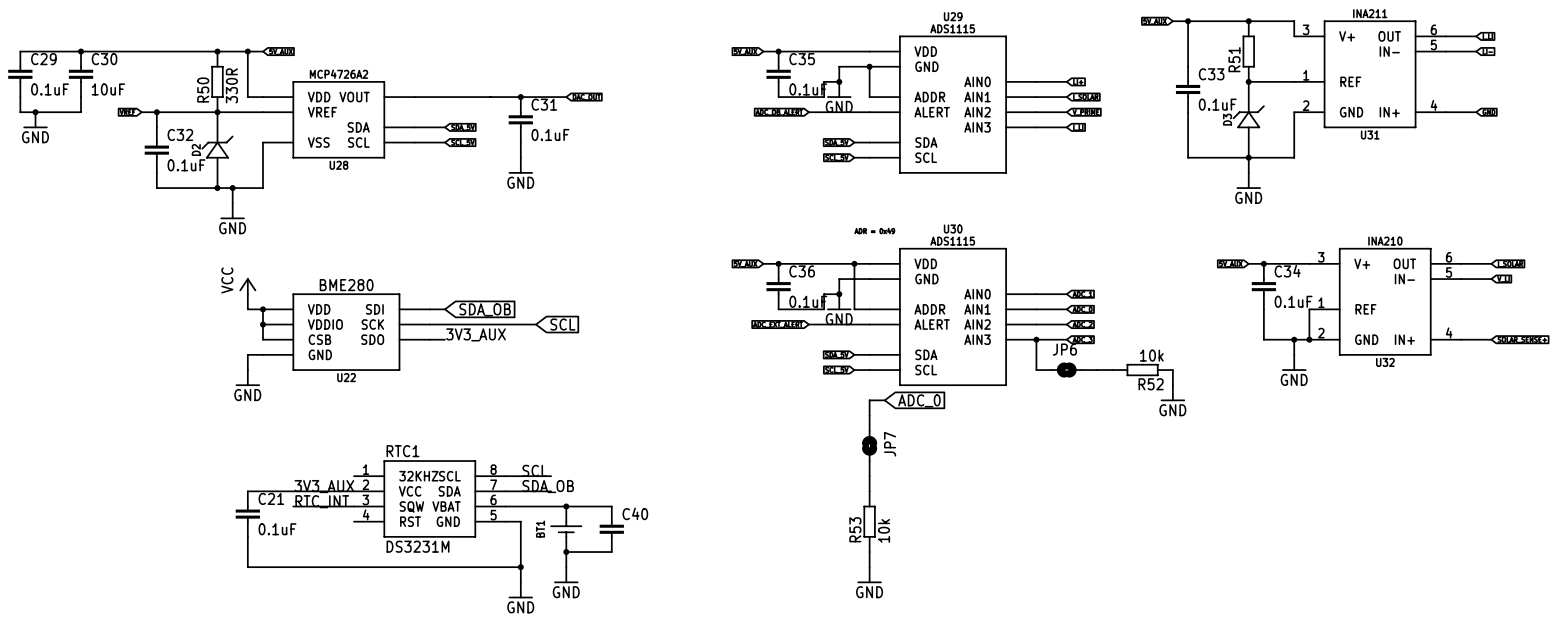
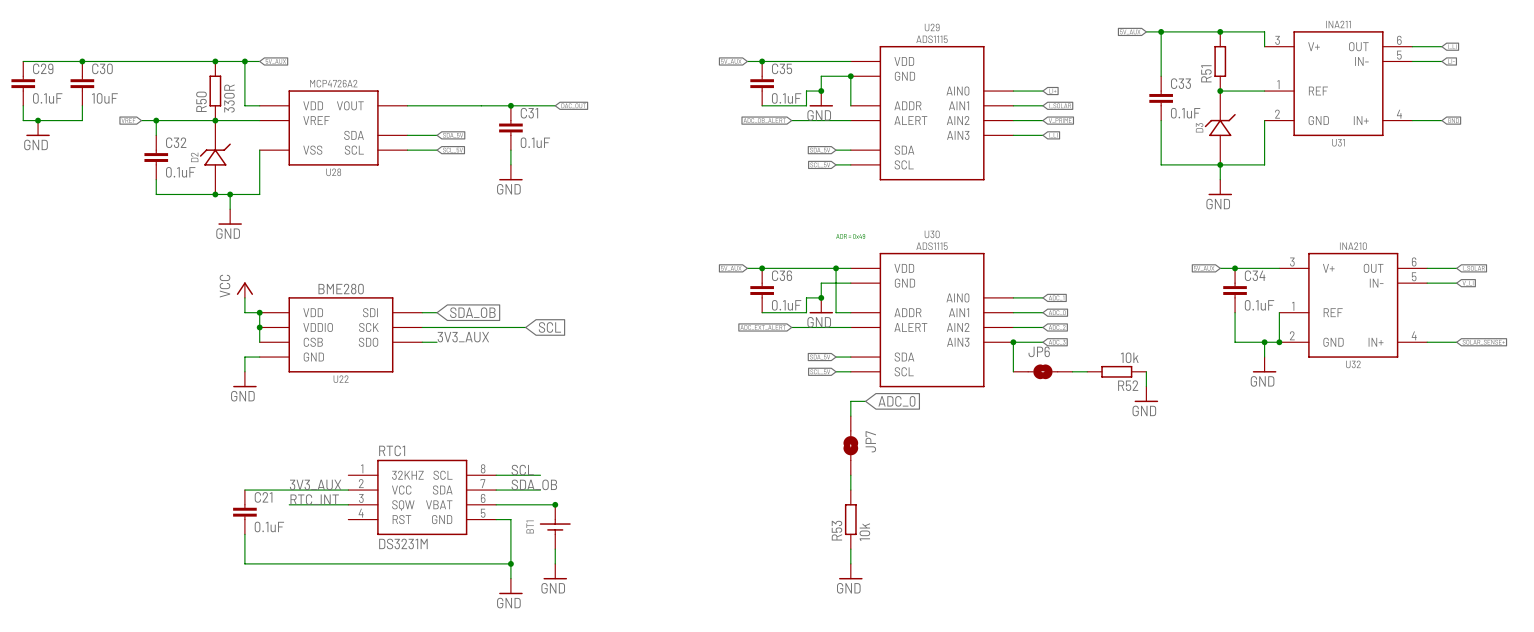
wire: (566, 506) (611, 506) -> none
C40: (611, 529) -> none
wire: (566, 552) (611, 552) -> none
junction: (566, 552) -> none

